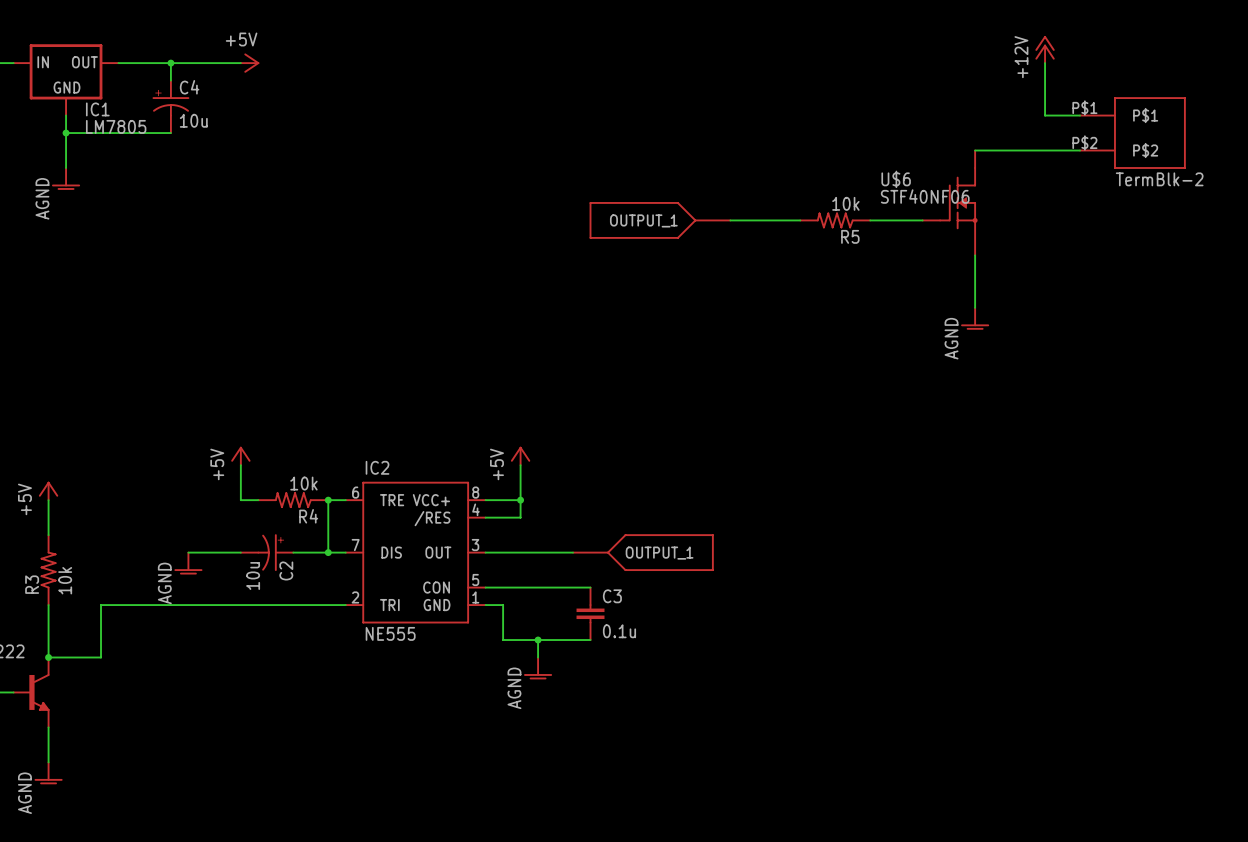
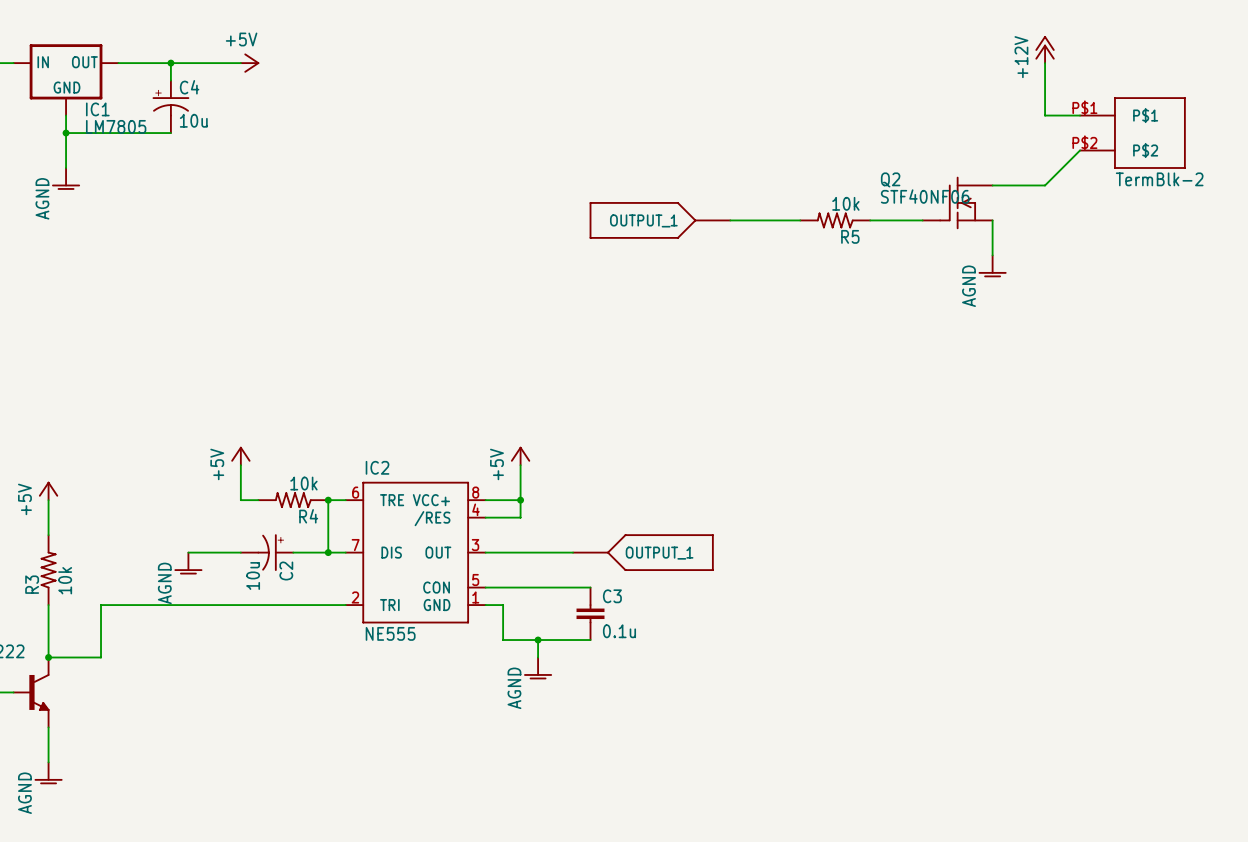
wire: (975, 150) (1080, 150) -> (992, 185) (1045, 185) (1080, 150)
U$6: STF40NF06 (950, 202) -> none
Q2: none -> STF40NF06 (957, 202)
wire: none -> (992, 220) (992, 255)
wire: (975, 255) (975, 307) -> none
power symbol position: AGND (975, 318) -> AGND (992, 266)

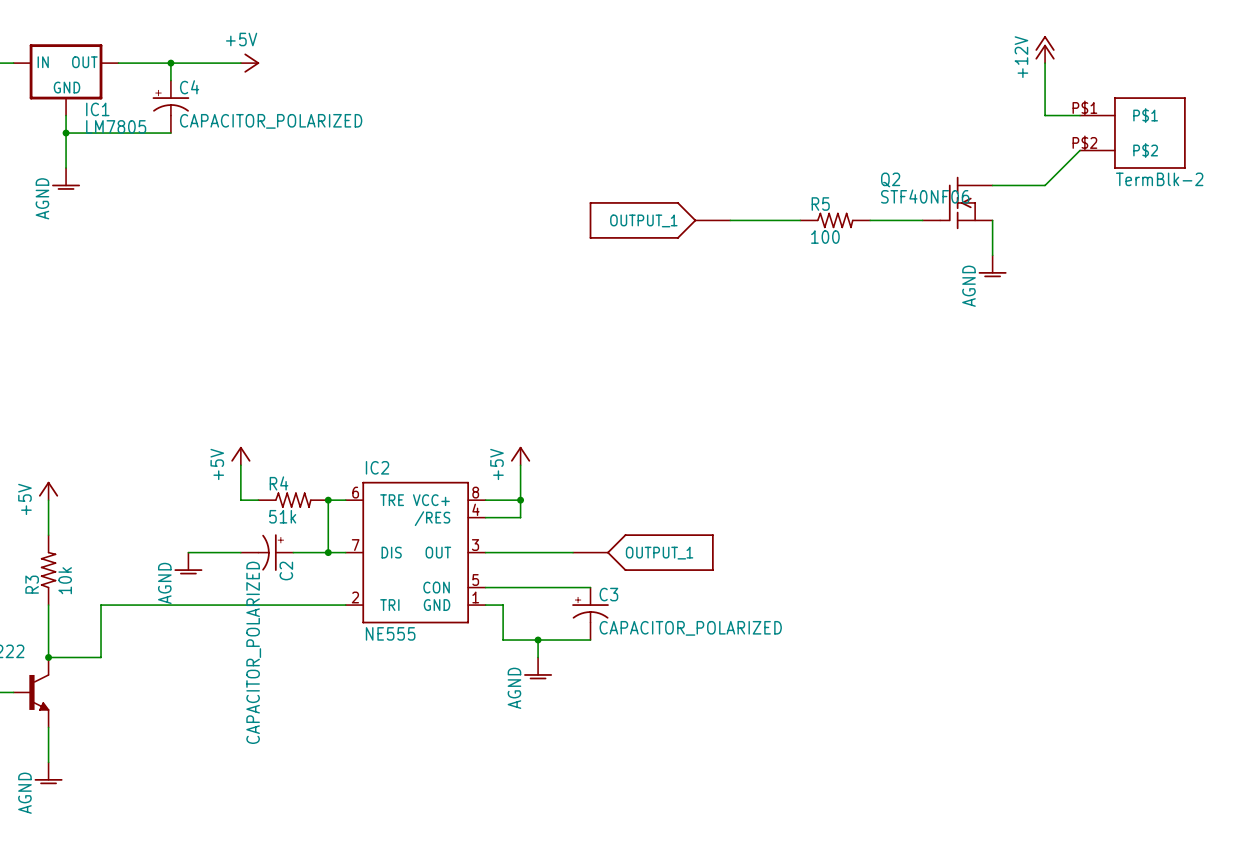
C4 value: 10u (193, 120) -> CAPACITOR_POLARIZED (271, 121)
R5 value: 10k (845, 203) -> 100 (825, 237)
R5 rotation: 0° (835, 220) -> 180° (835, 220)
R4 value: 10k (303, 483) -> 51k (282, 516)
R4 rotation: 0° (293, 500) -> 180° (293, 500)
C2 value: 10u (253, 575) -> CAPACITOR_POLARIZED (253, 652)
C3 symbol: [576, 587, 605, 641] -> [572, 587, 609, 641]
C3 value: 0.1u (619, 631) -> CAPACITOR_POLARIZED (690, 628)

